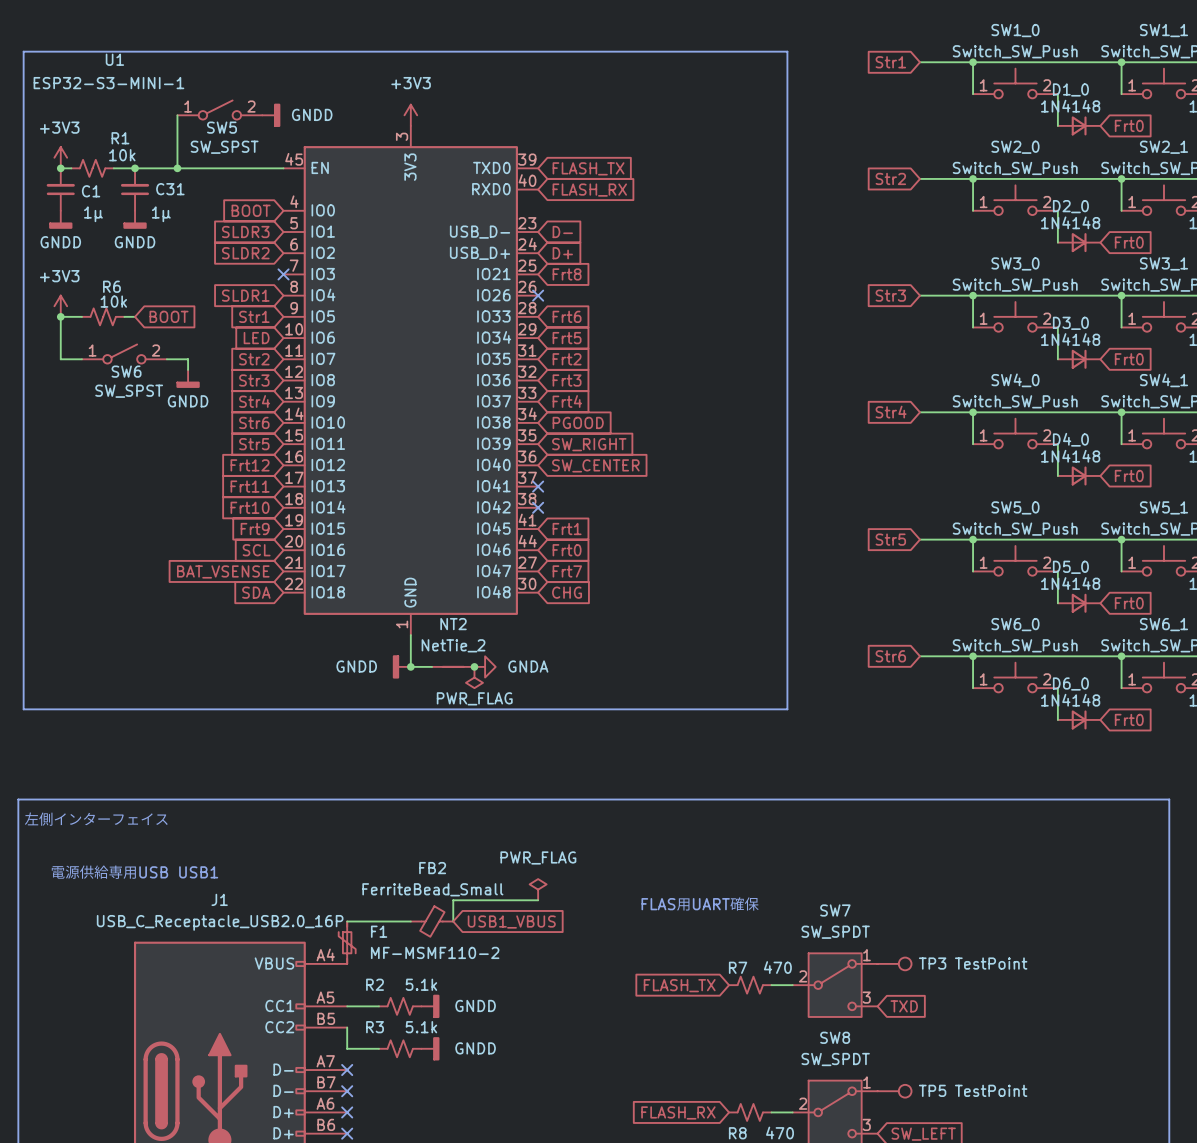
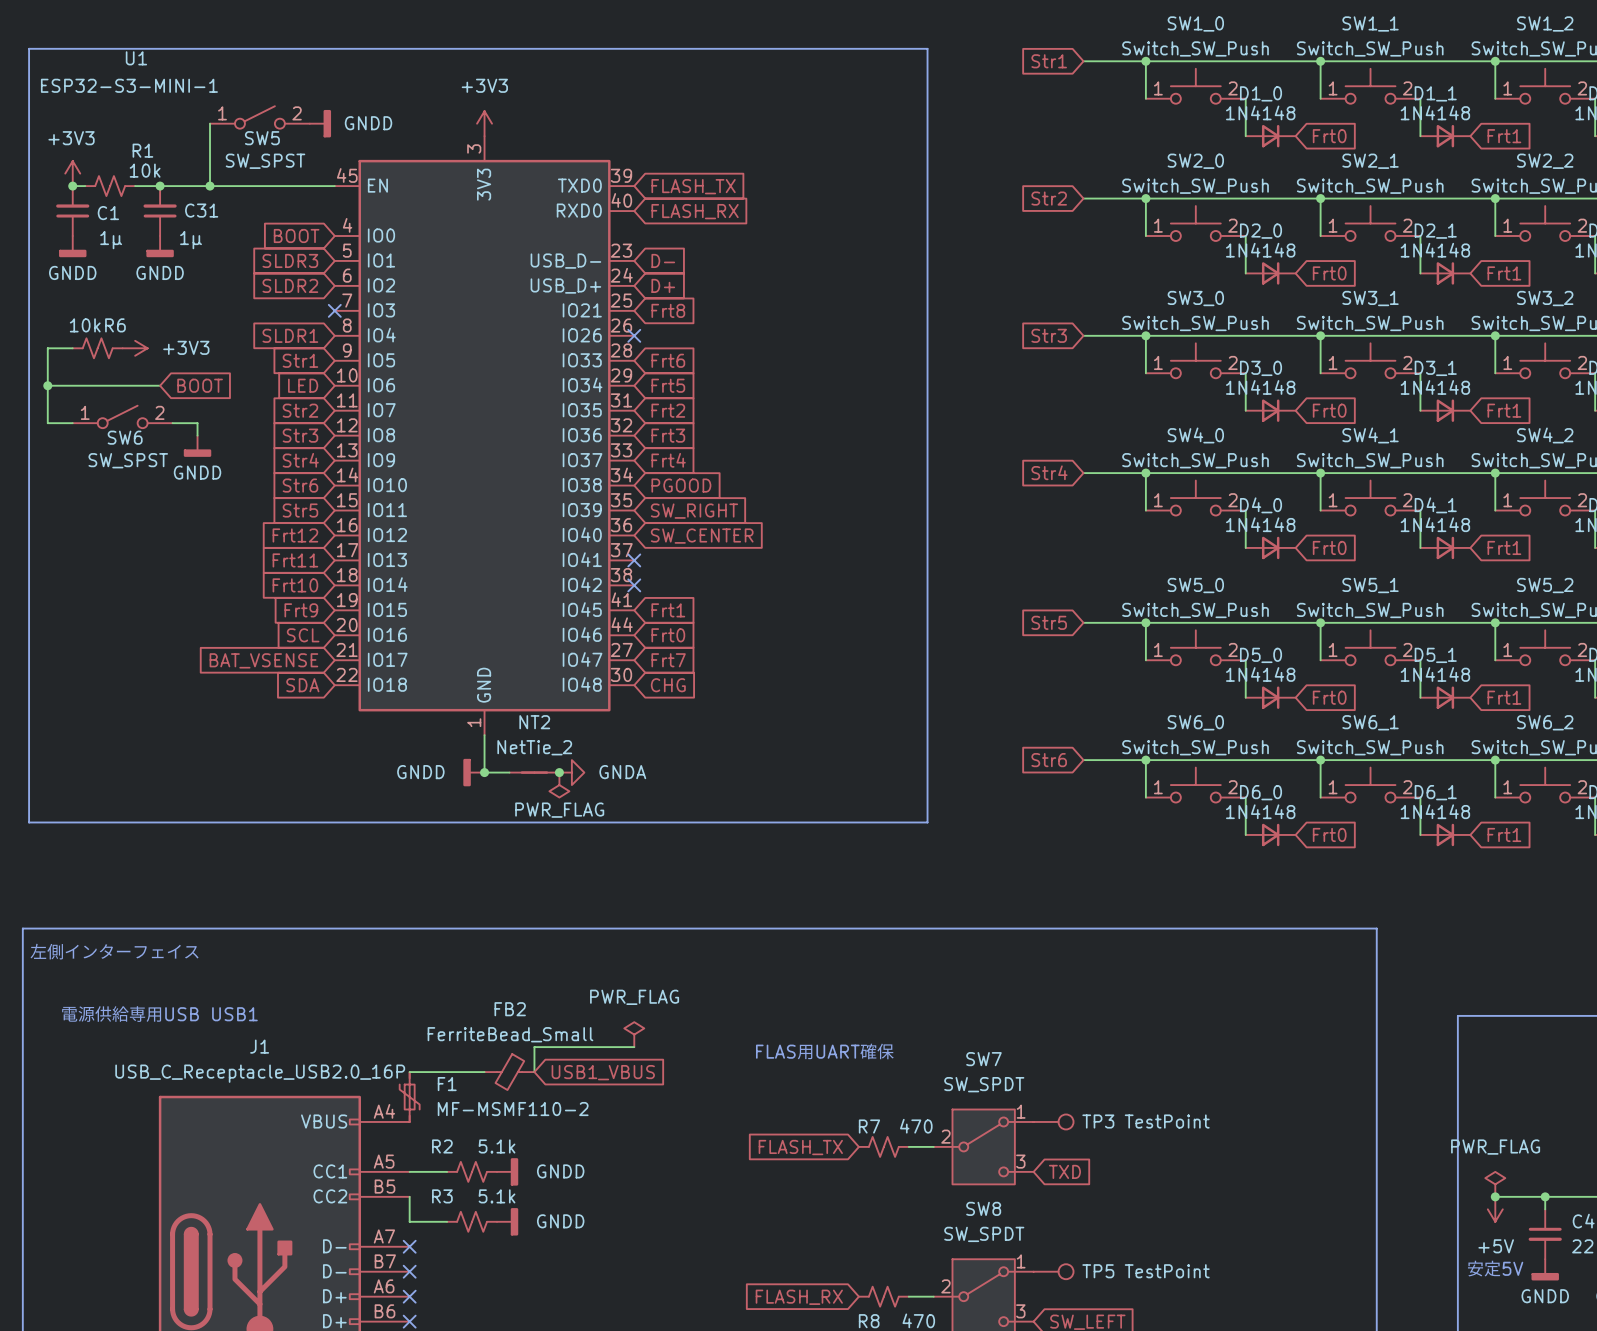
R6 name position: R6 (111, 286) -> R6 (115, 325)
R6 value position: 10k (113, 301) -> 10k (85, 325)
wire: none -> (72, 348) (47, 348) (47, 423) (72, 423)
power symbol rotation: 0° (60, 306) -> 90° clockwise (135, 348)
power symbol position: +3V3 (60, 306) -> +3V3 (135, 348)
junction position: (60, 316) -> (47, 385)
wire: (81, 316) (60, 316) (60, 359) (81, 359) -> none
R6 position: (103, 316) -> (97, 348)
wire: (124, 316) (135, 316) -> none
global label position: BOOT (169, 316) -> BOOT (200, 385)
wire: none -> (47, 385) (160, 385)
SW6 position: (124, 353) -> (122, 416)
wire: (166, 359) (188, 359) (188, 369) -> (172, 423) (197, 423) (197, 435)
power symbol position: GNDD (188, 378) -> GNDD (197, 446)

